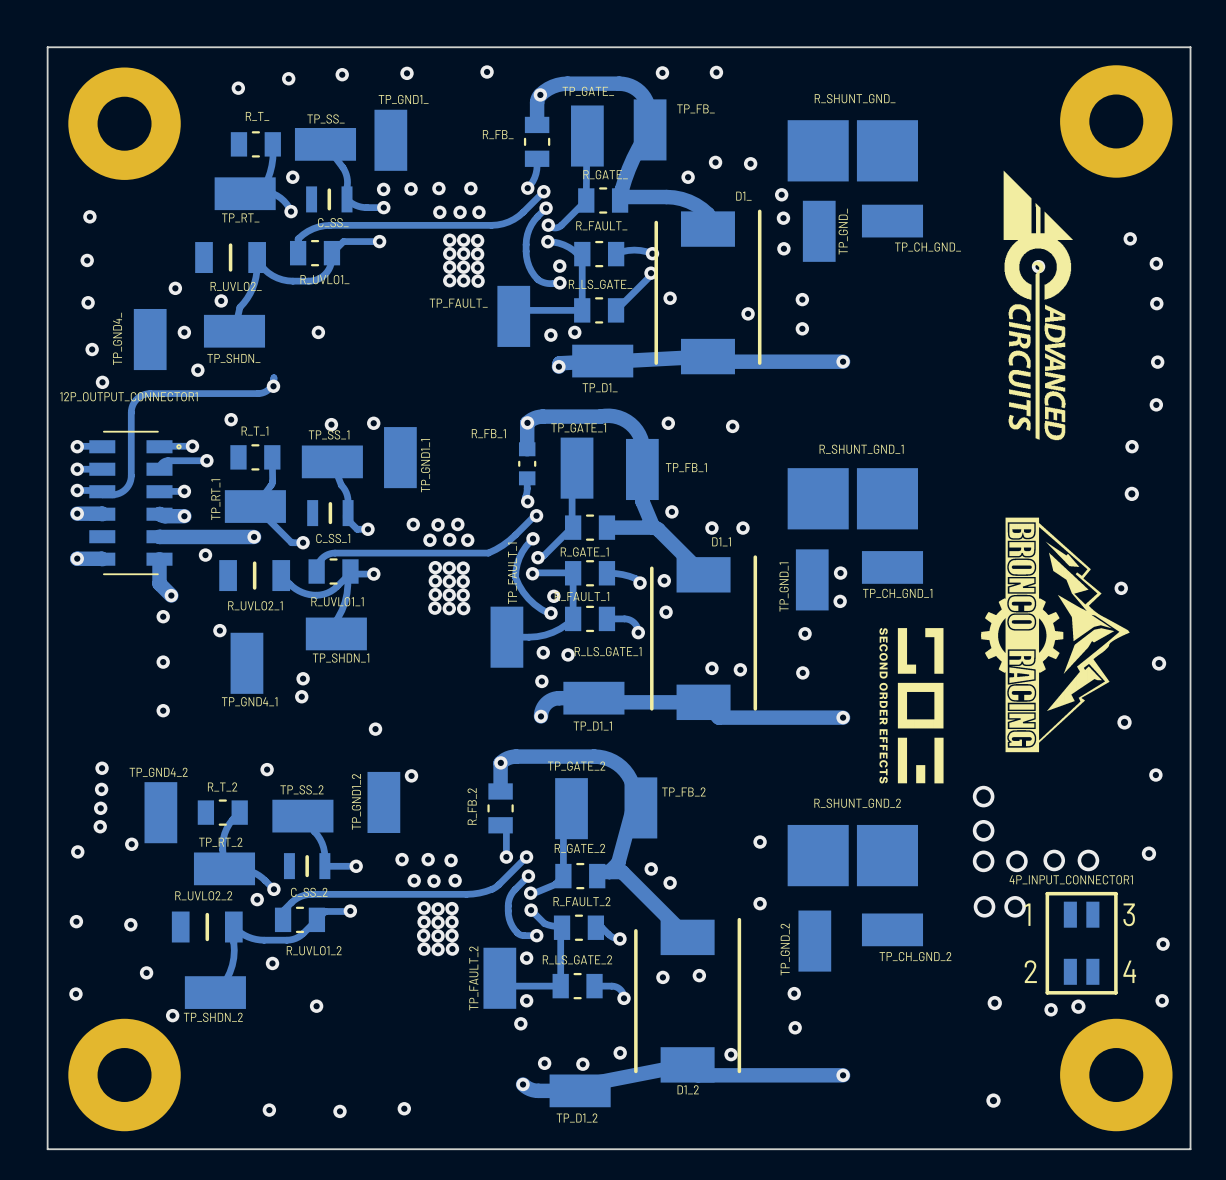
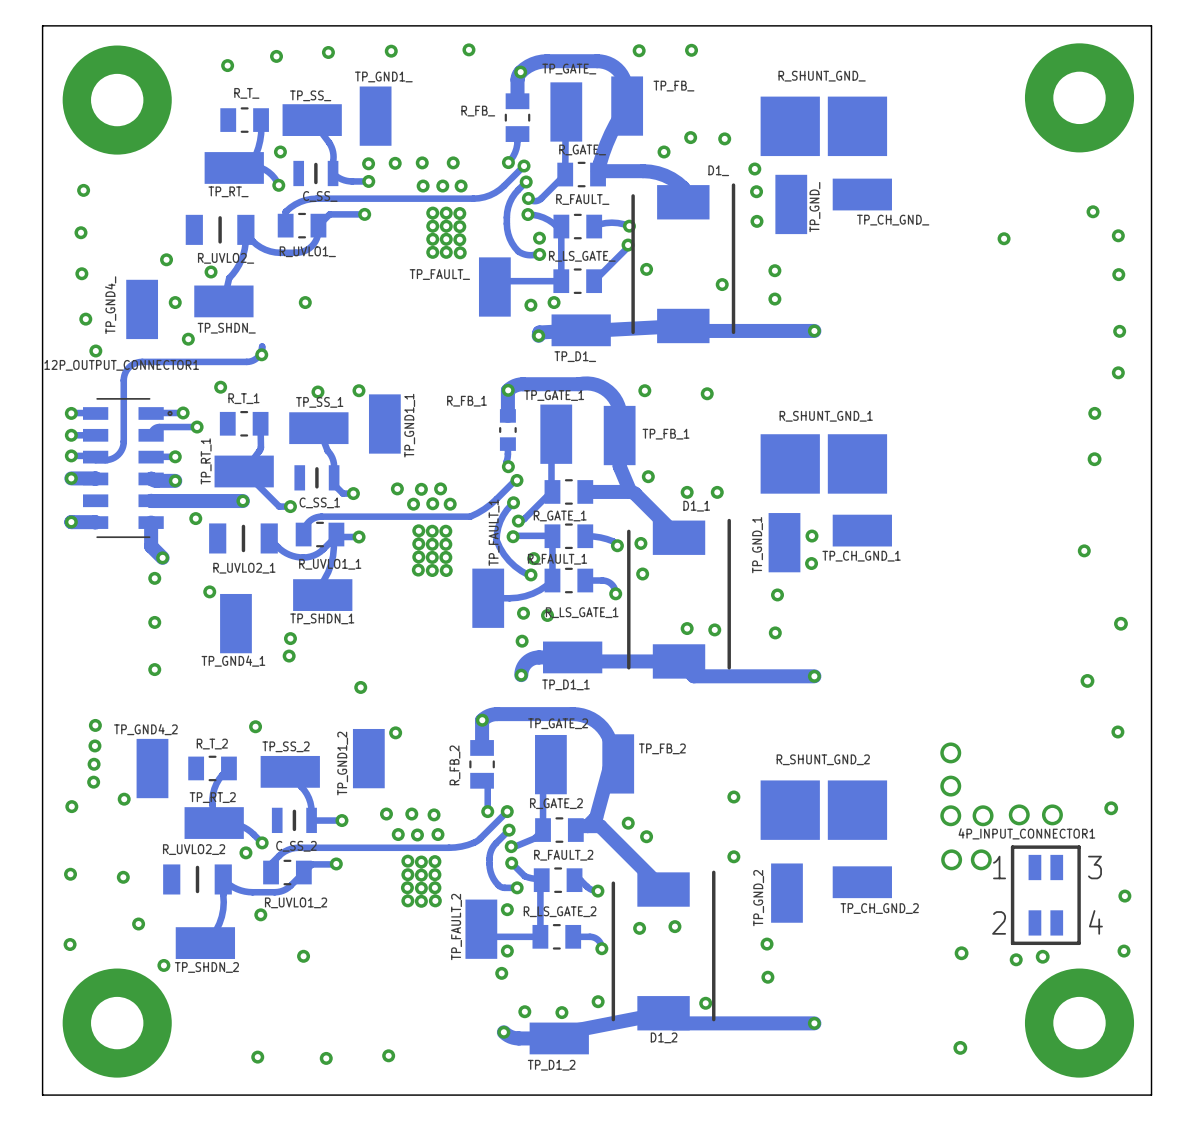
drawing: [1003, 170, 1073, 441] -> none
drawing: [981, 517, 1130, 753] -> none
drawing: [879, 628, 944, 784] -> none

